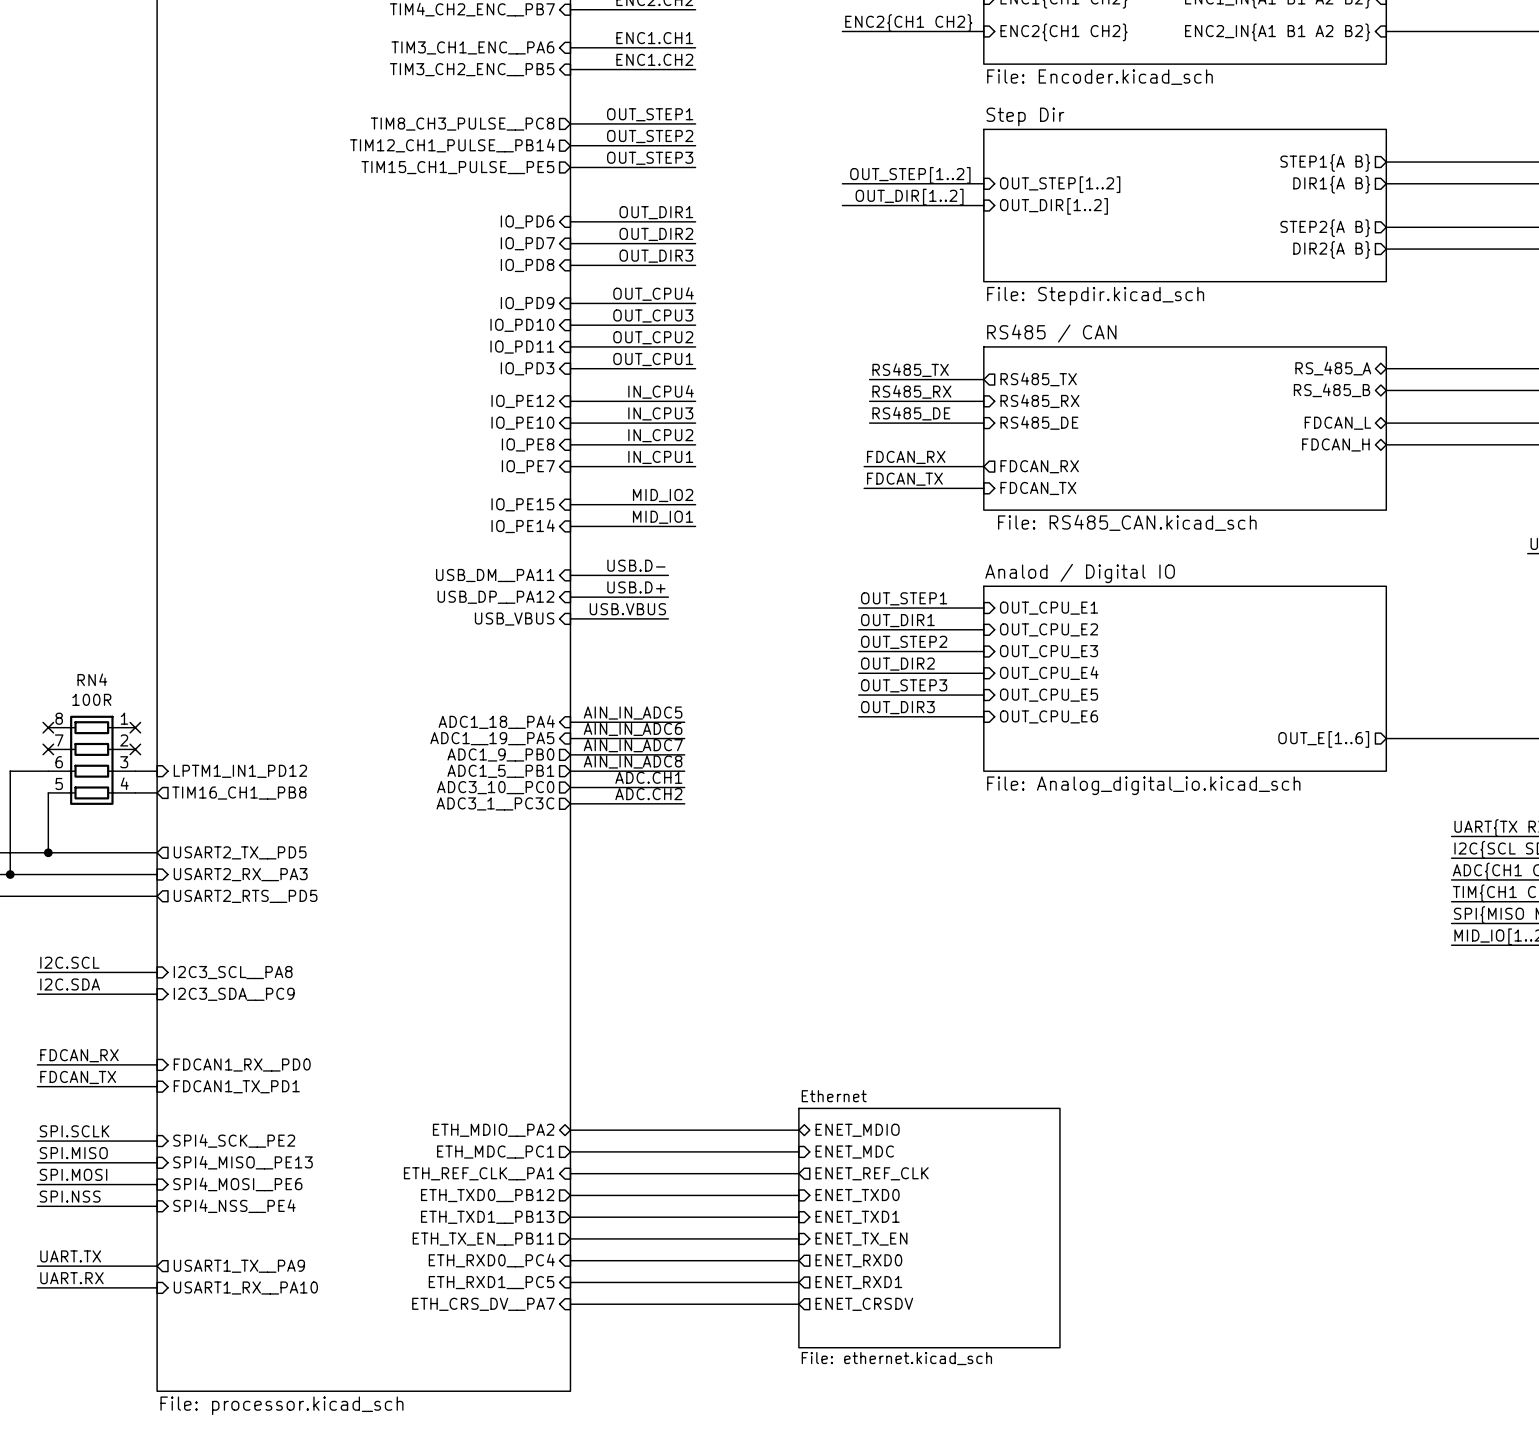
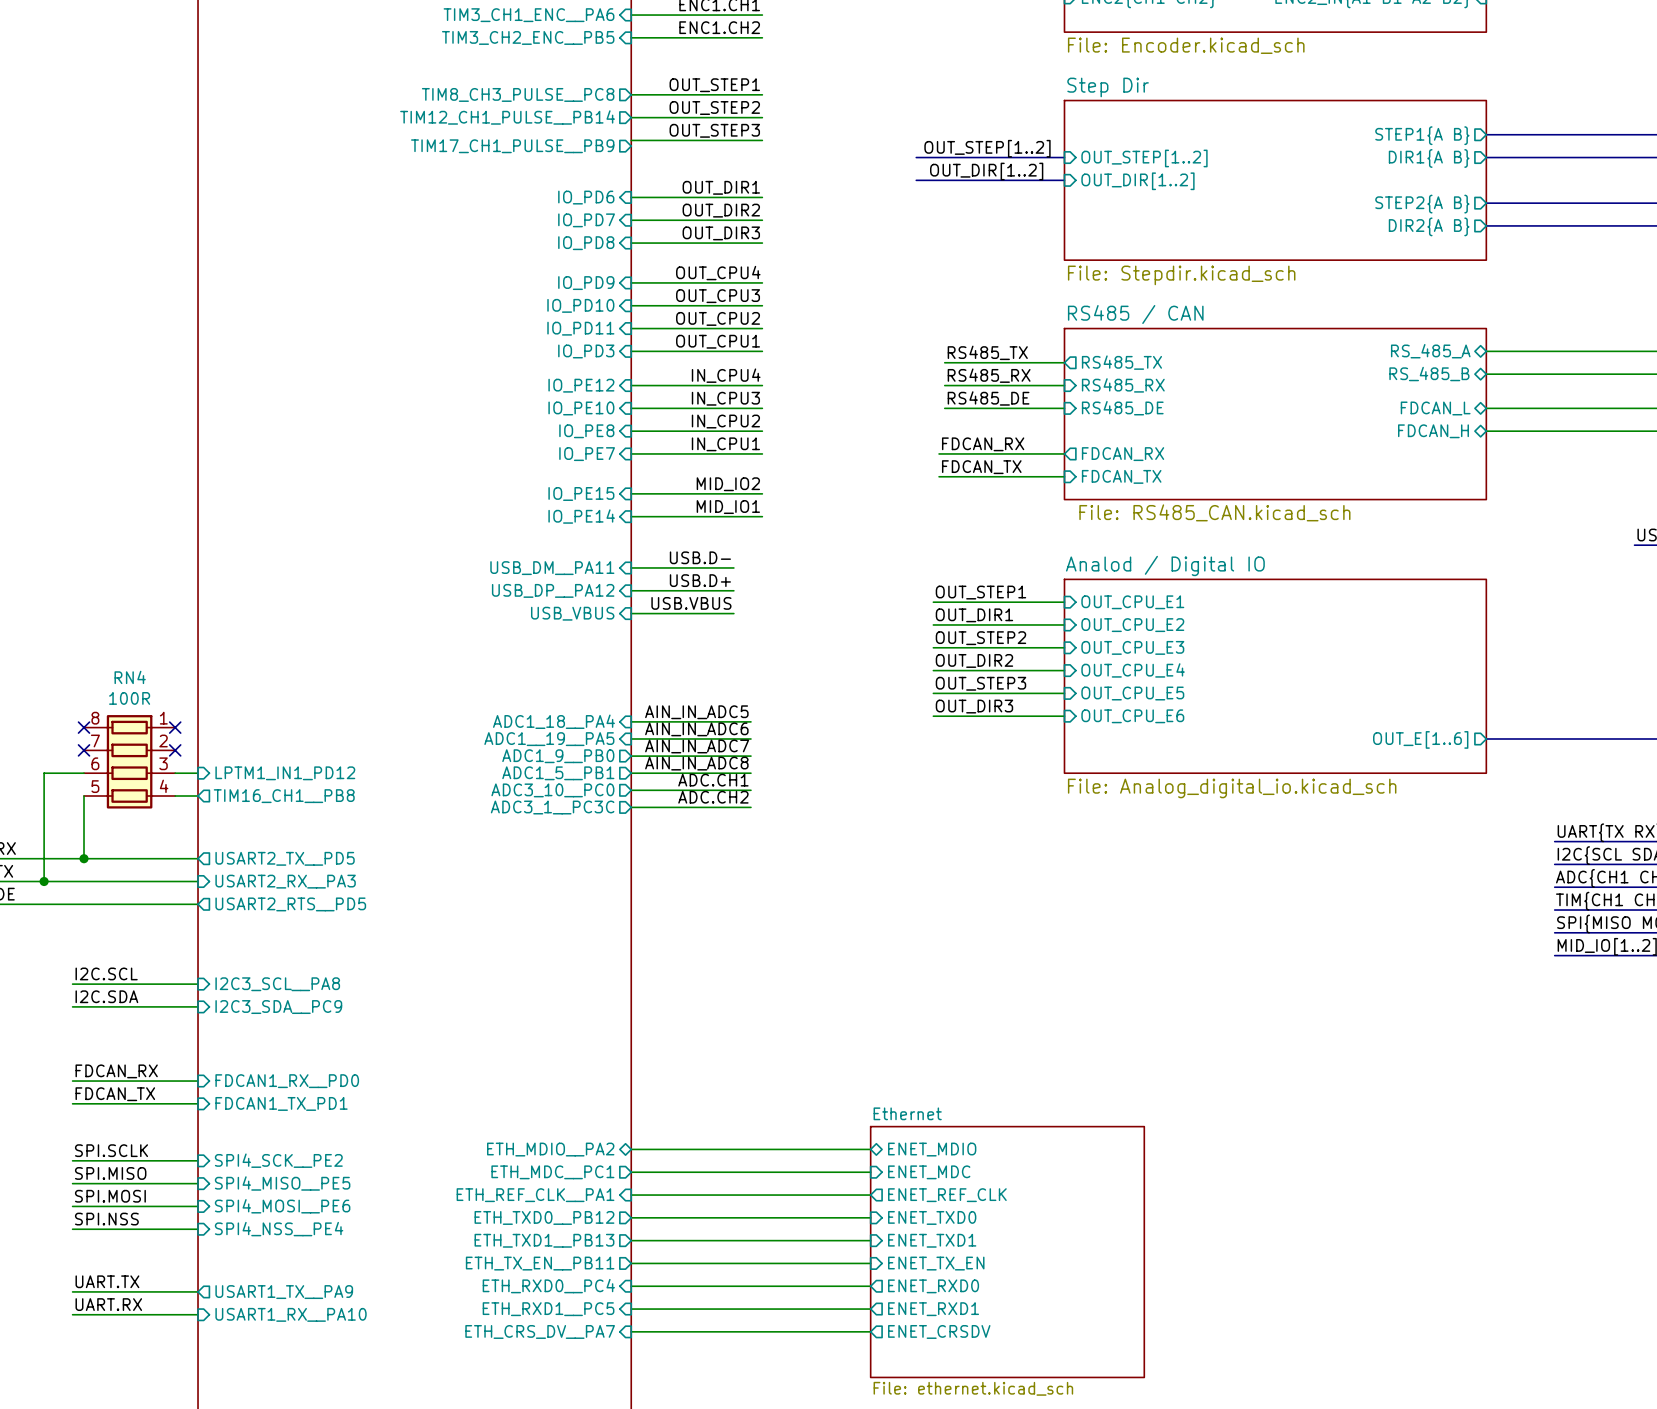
sheet pin: TIM15_CH1_PULSE__PE5 (457, 167) -> TIM17_CH1_PULSE__PB9 (512, 146)
sheet pin: SPI4_MISO__PE13 (242, 1162) -> SPI4_MISO__PE5 (282, 1183)

